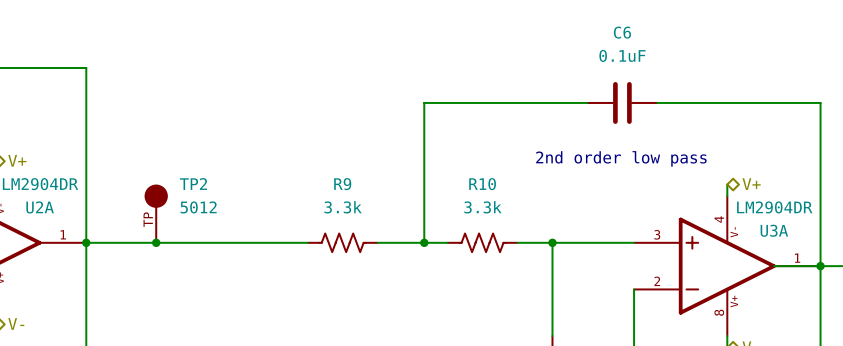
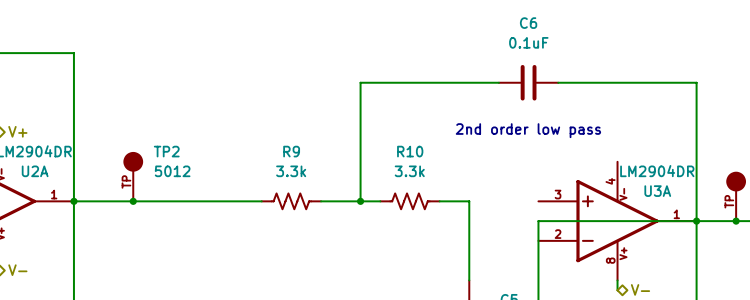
wire: (727, 184) (727, 196) -> none
hierarchical label: V+ (751, 184) -> none
wire: (552, 242) (634, 242) -> none
junction: (552, 242) -> none
wire: none -> (657, 221) (538, 221) (538, 240)

